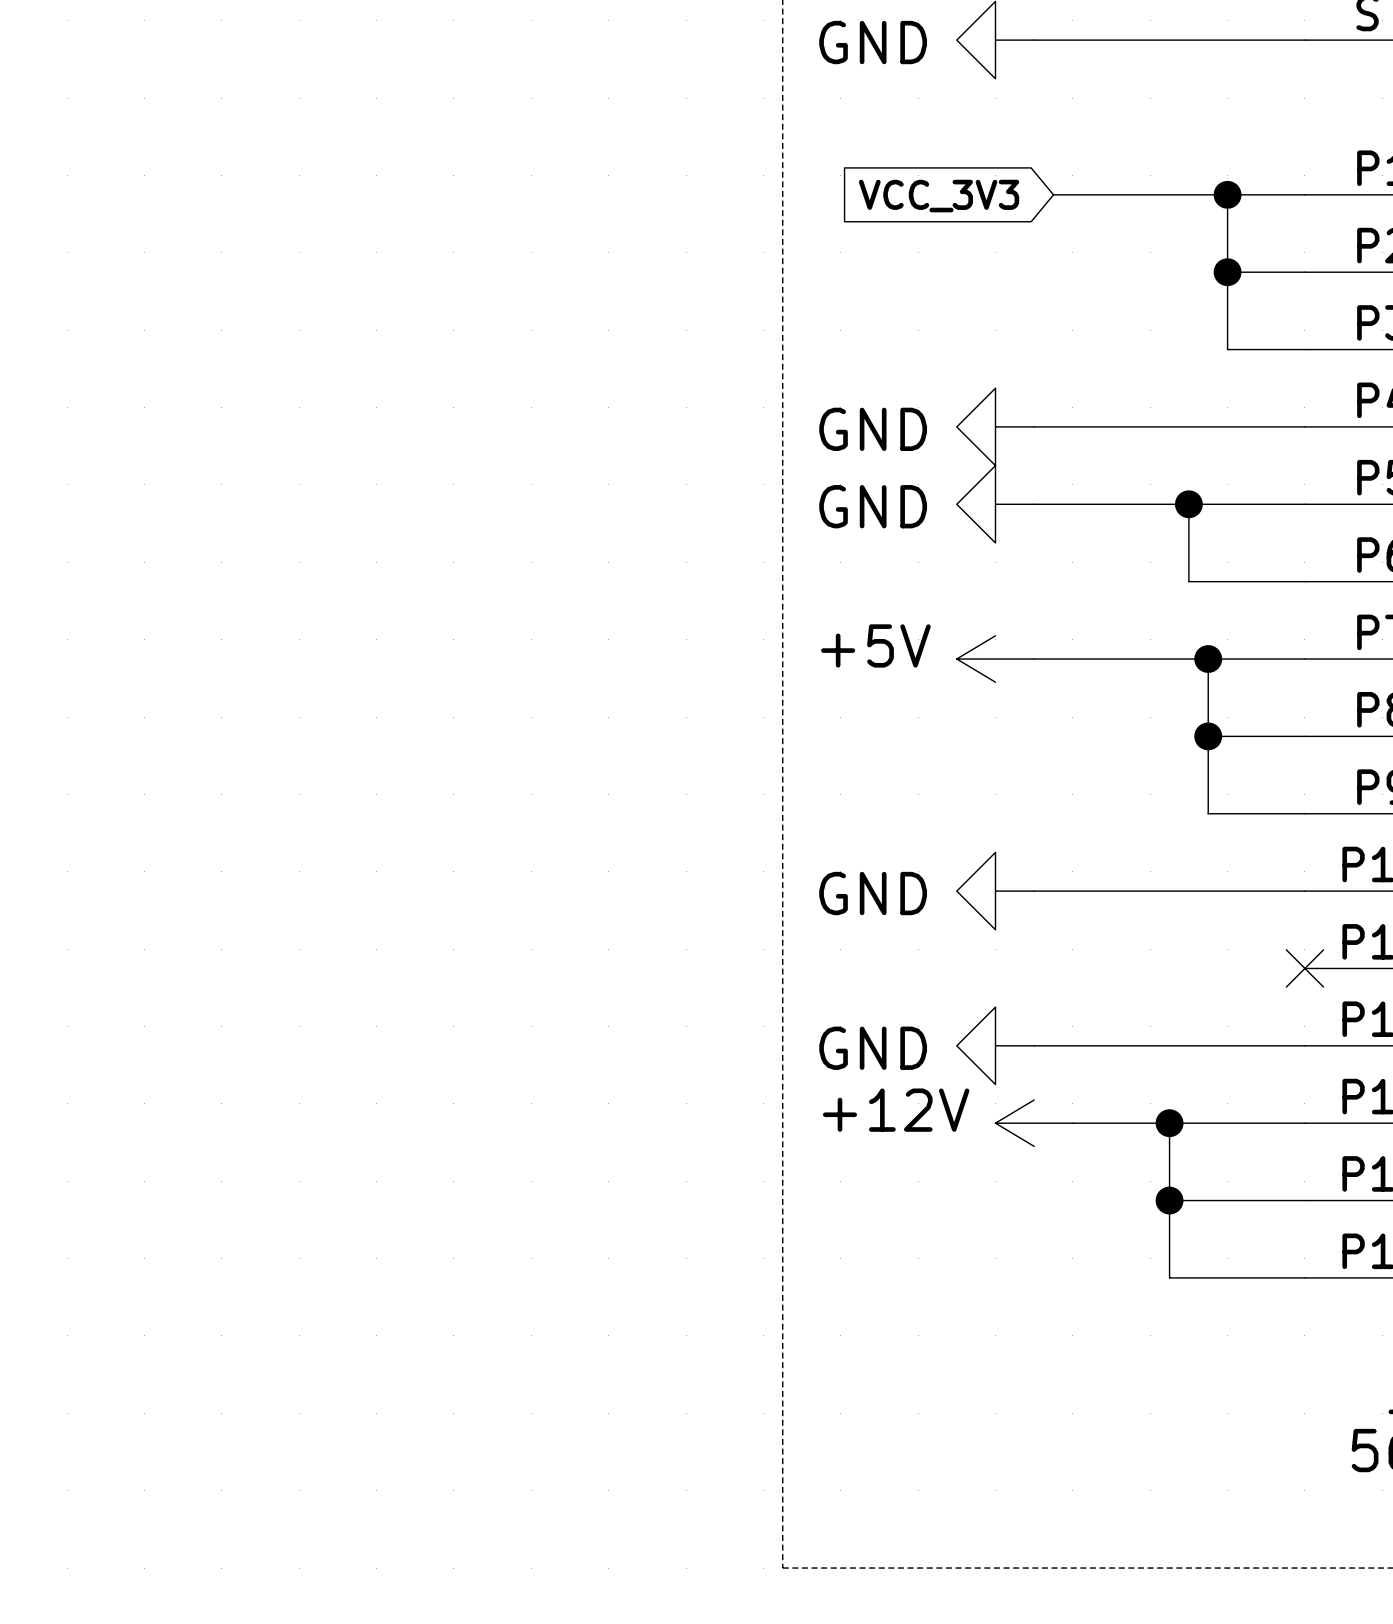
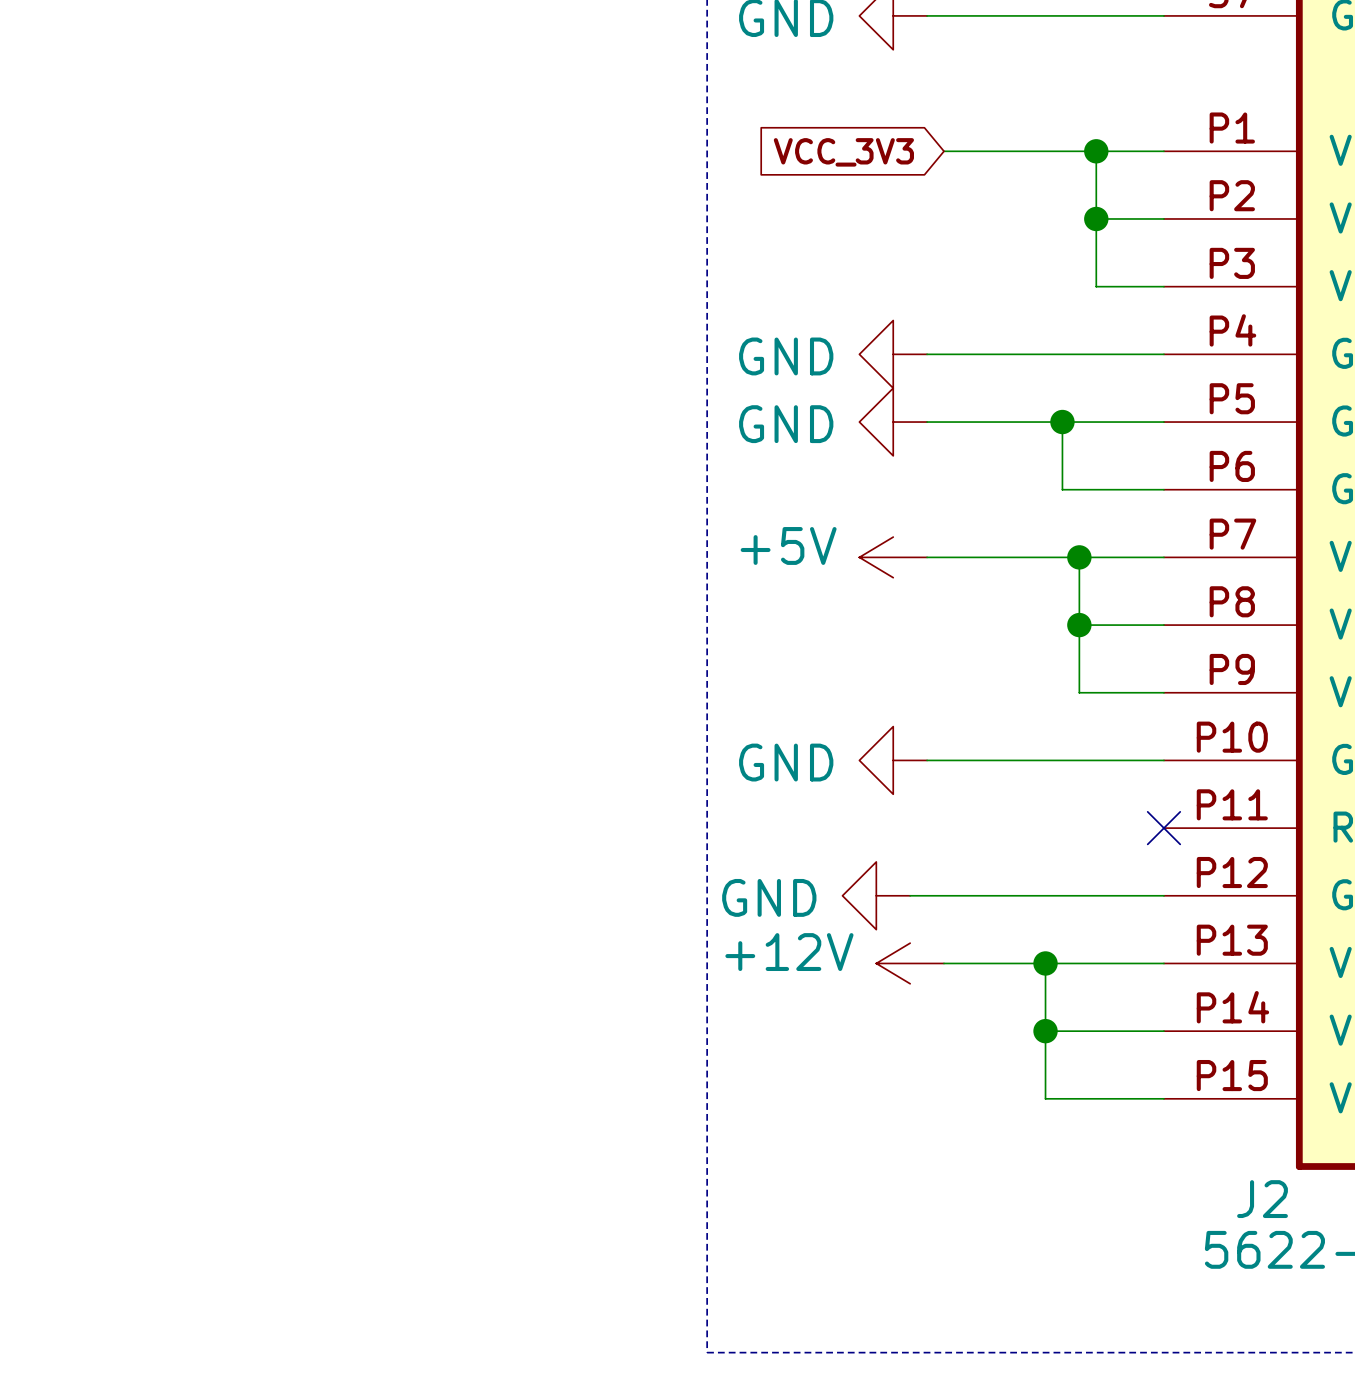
power symbol position: GND (995, 1045) -> GND (876, 895)
power symbol position: +12V (1034, 1123) -> +12V (910, 963)

